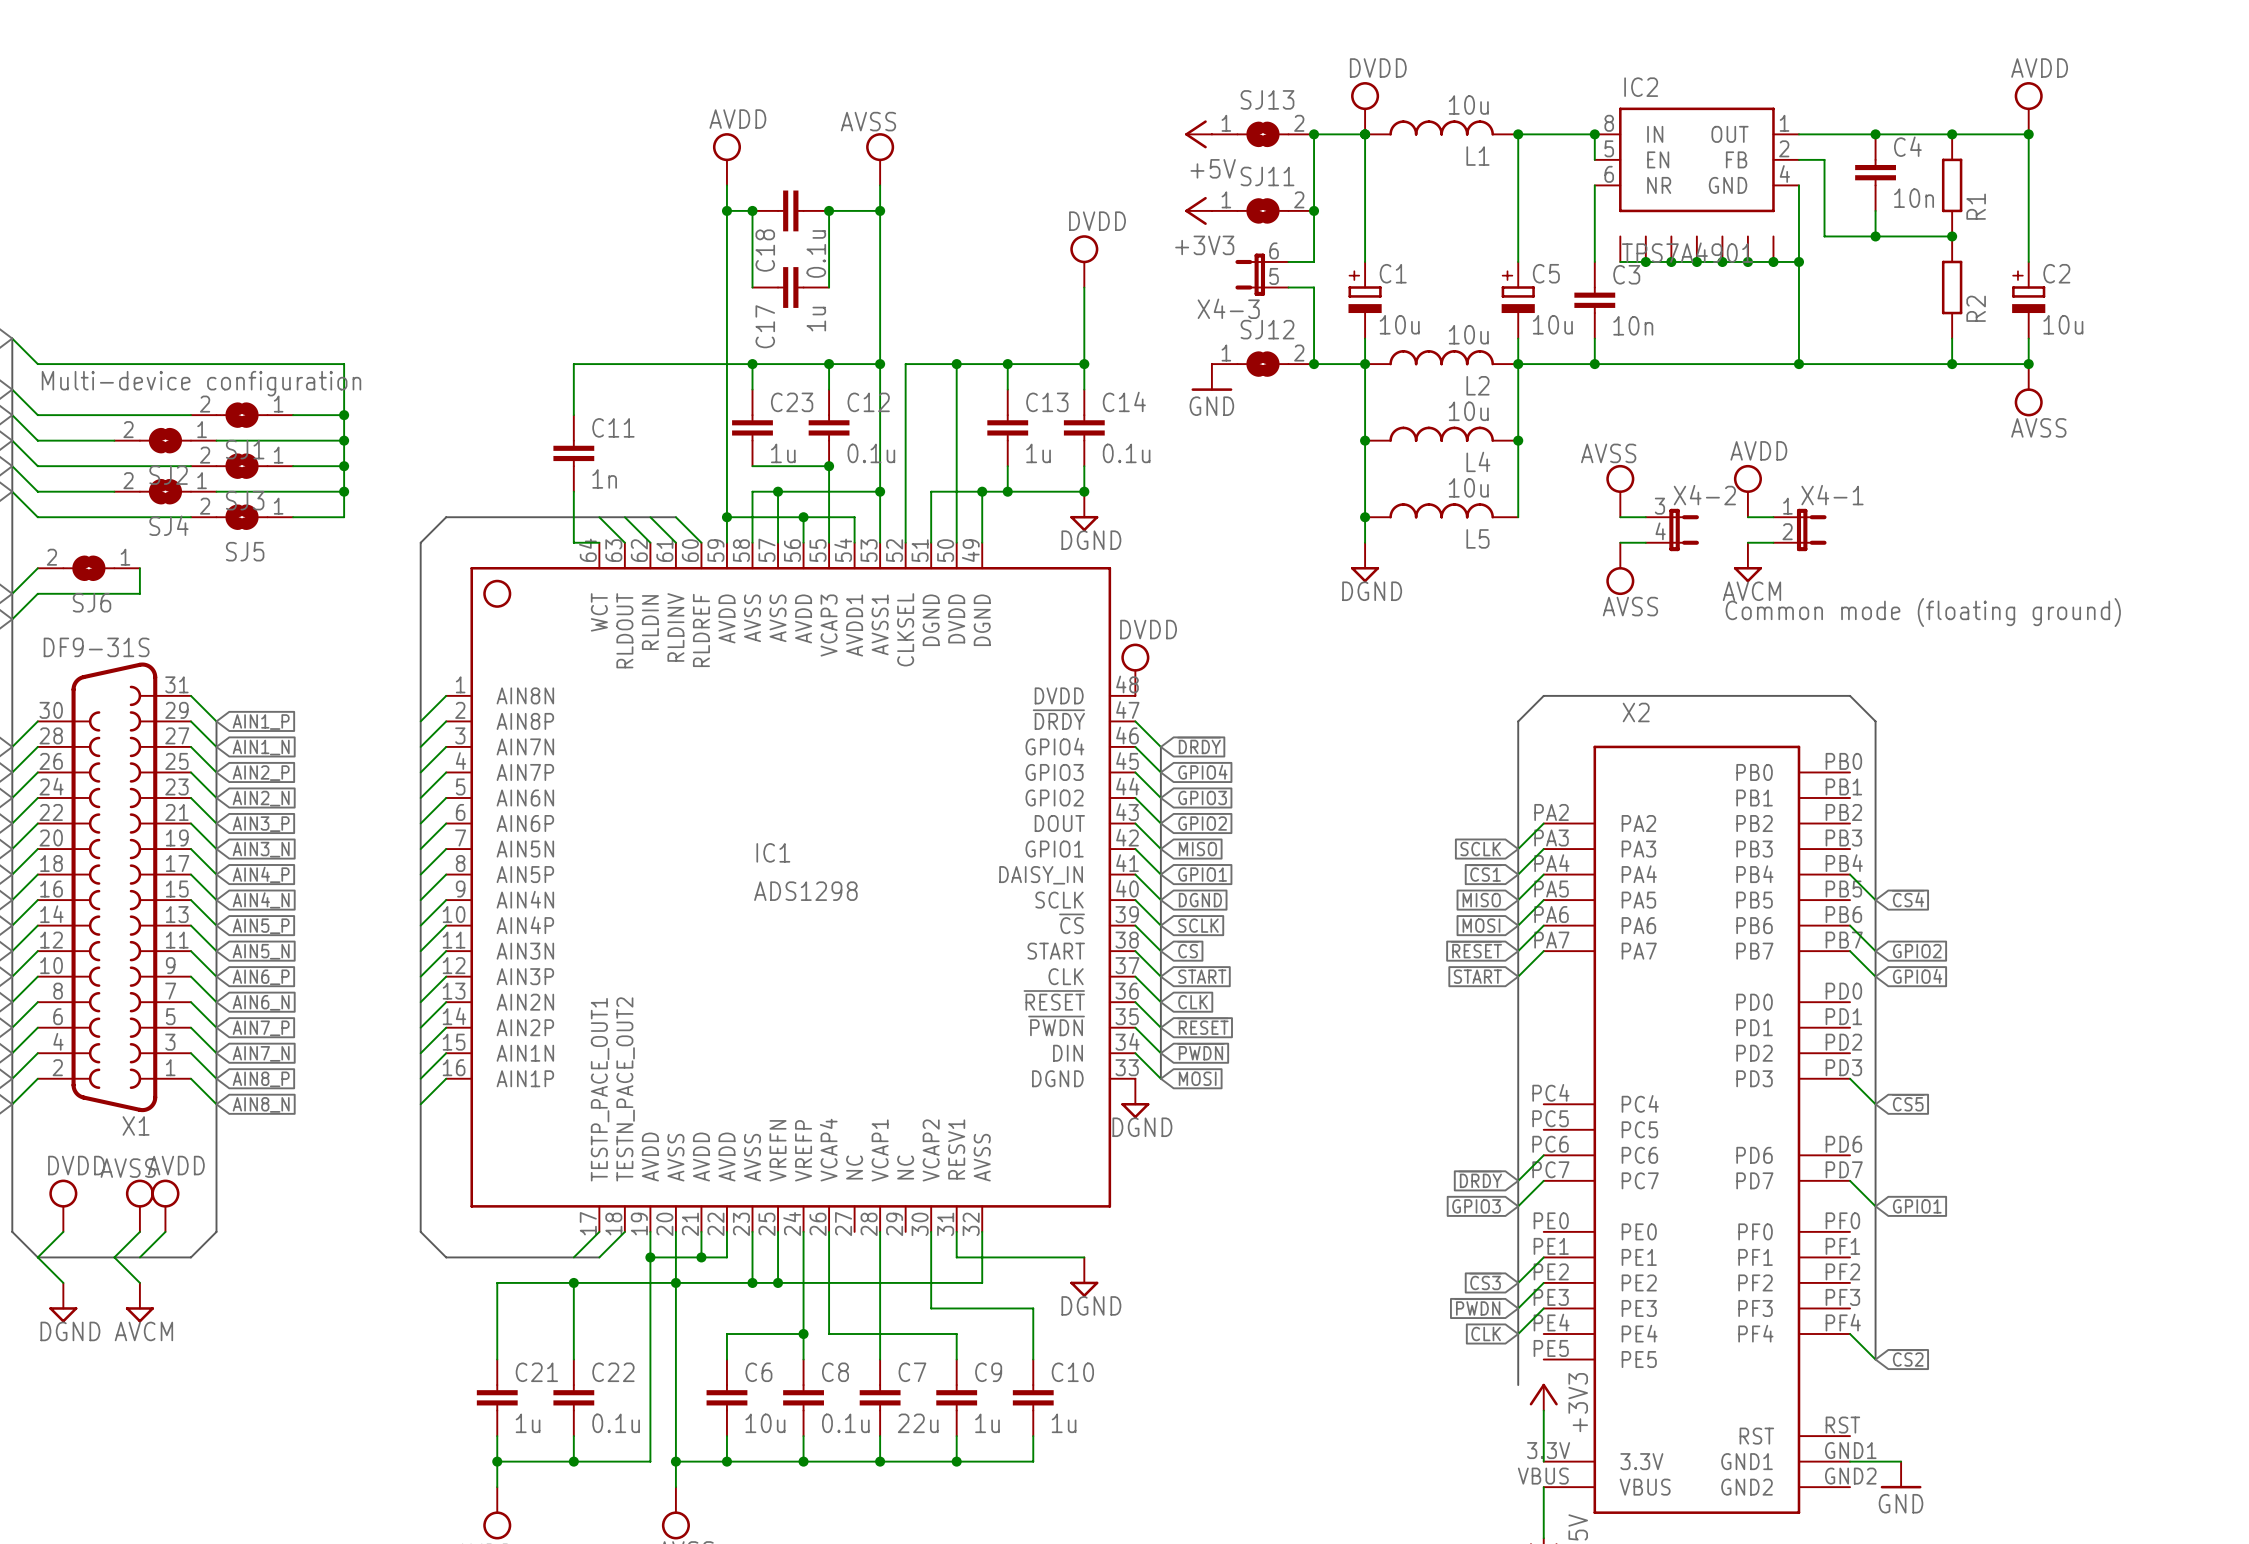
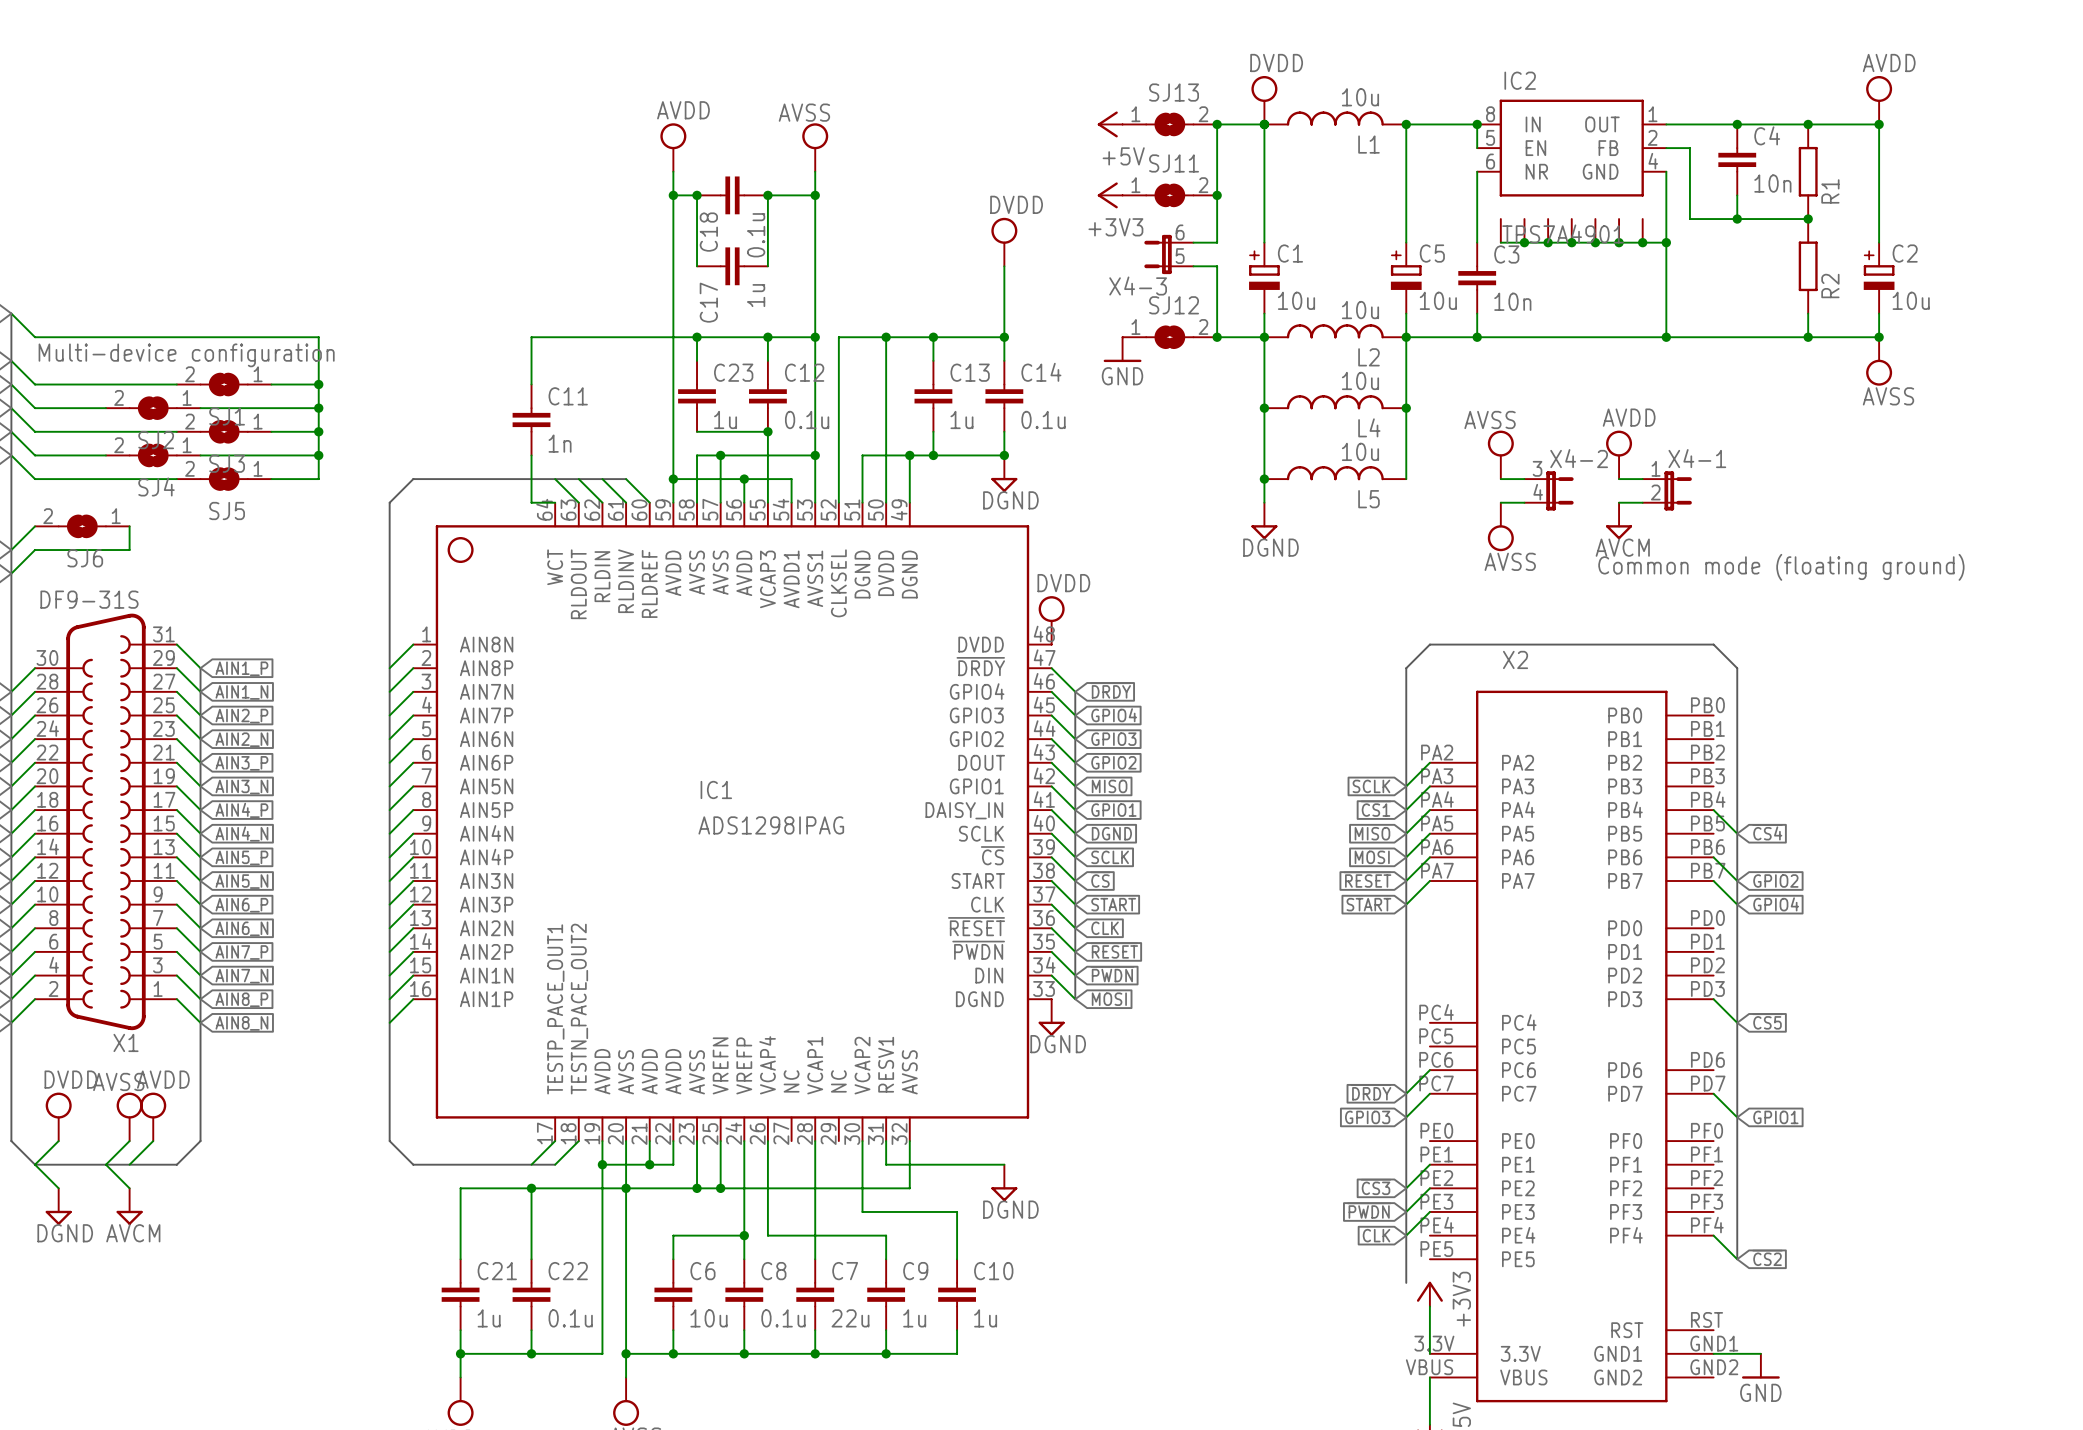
IC1 value: ADS1298 (805, 891) -> ADS1298IPAG (771, 825)

